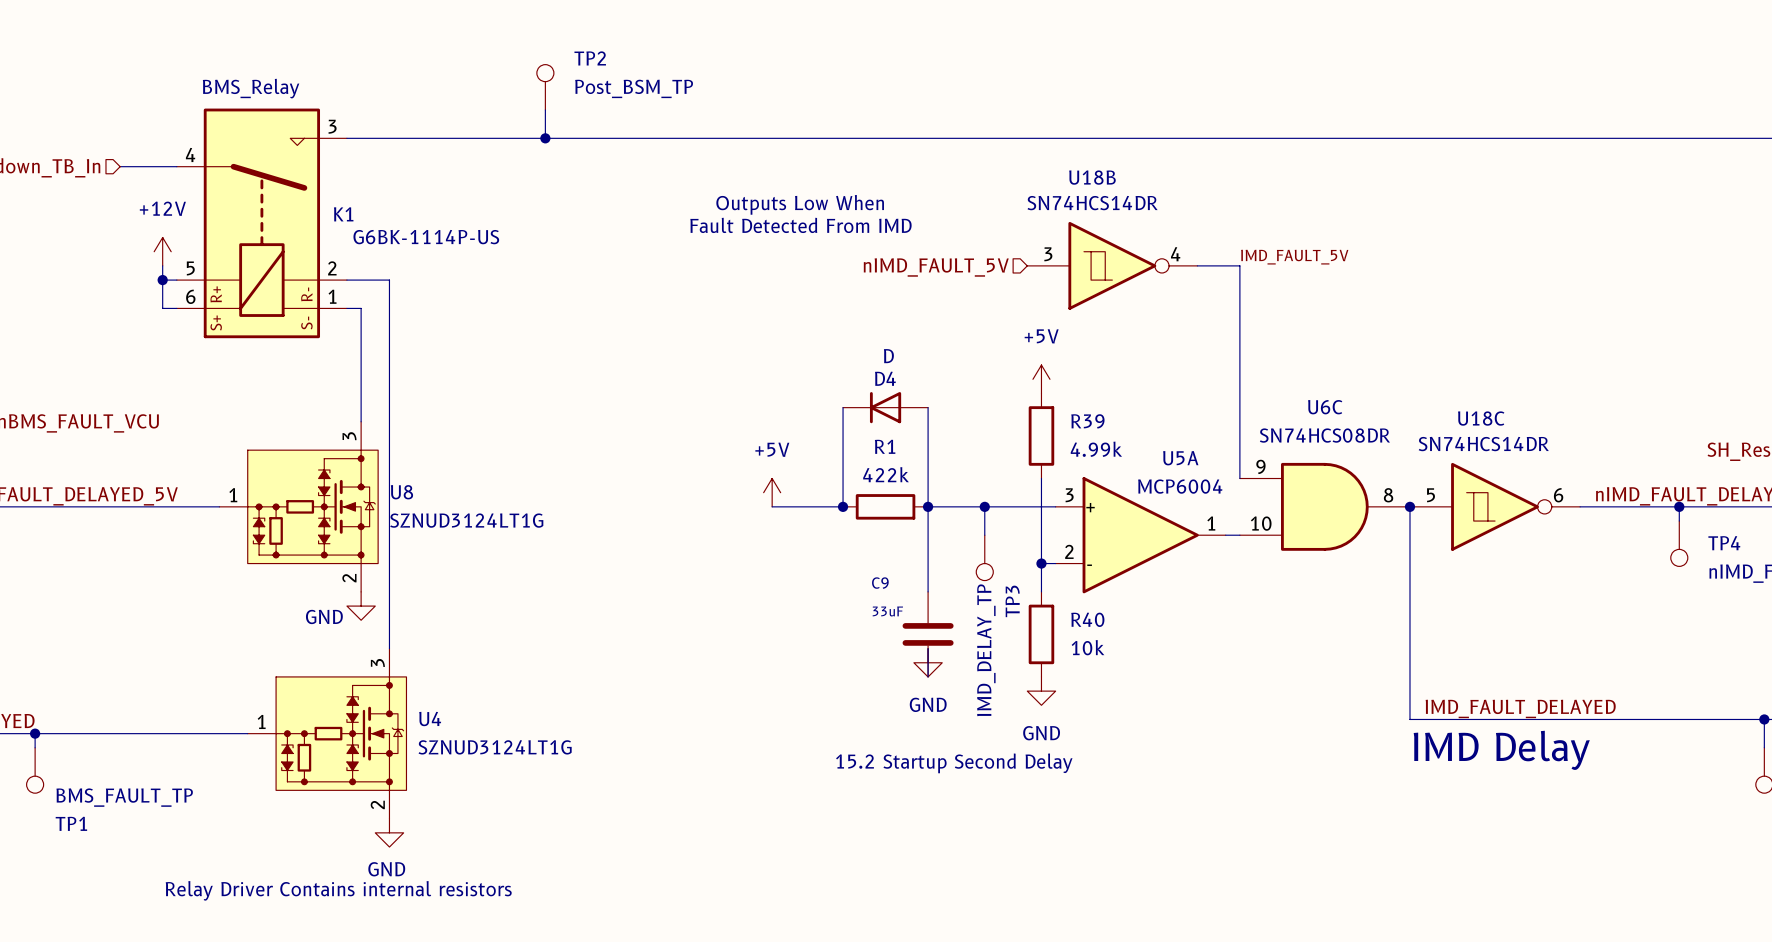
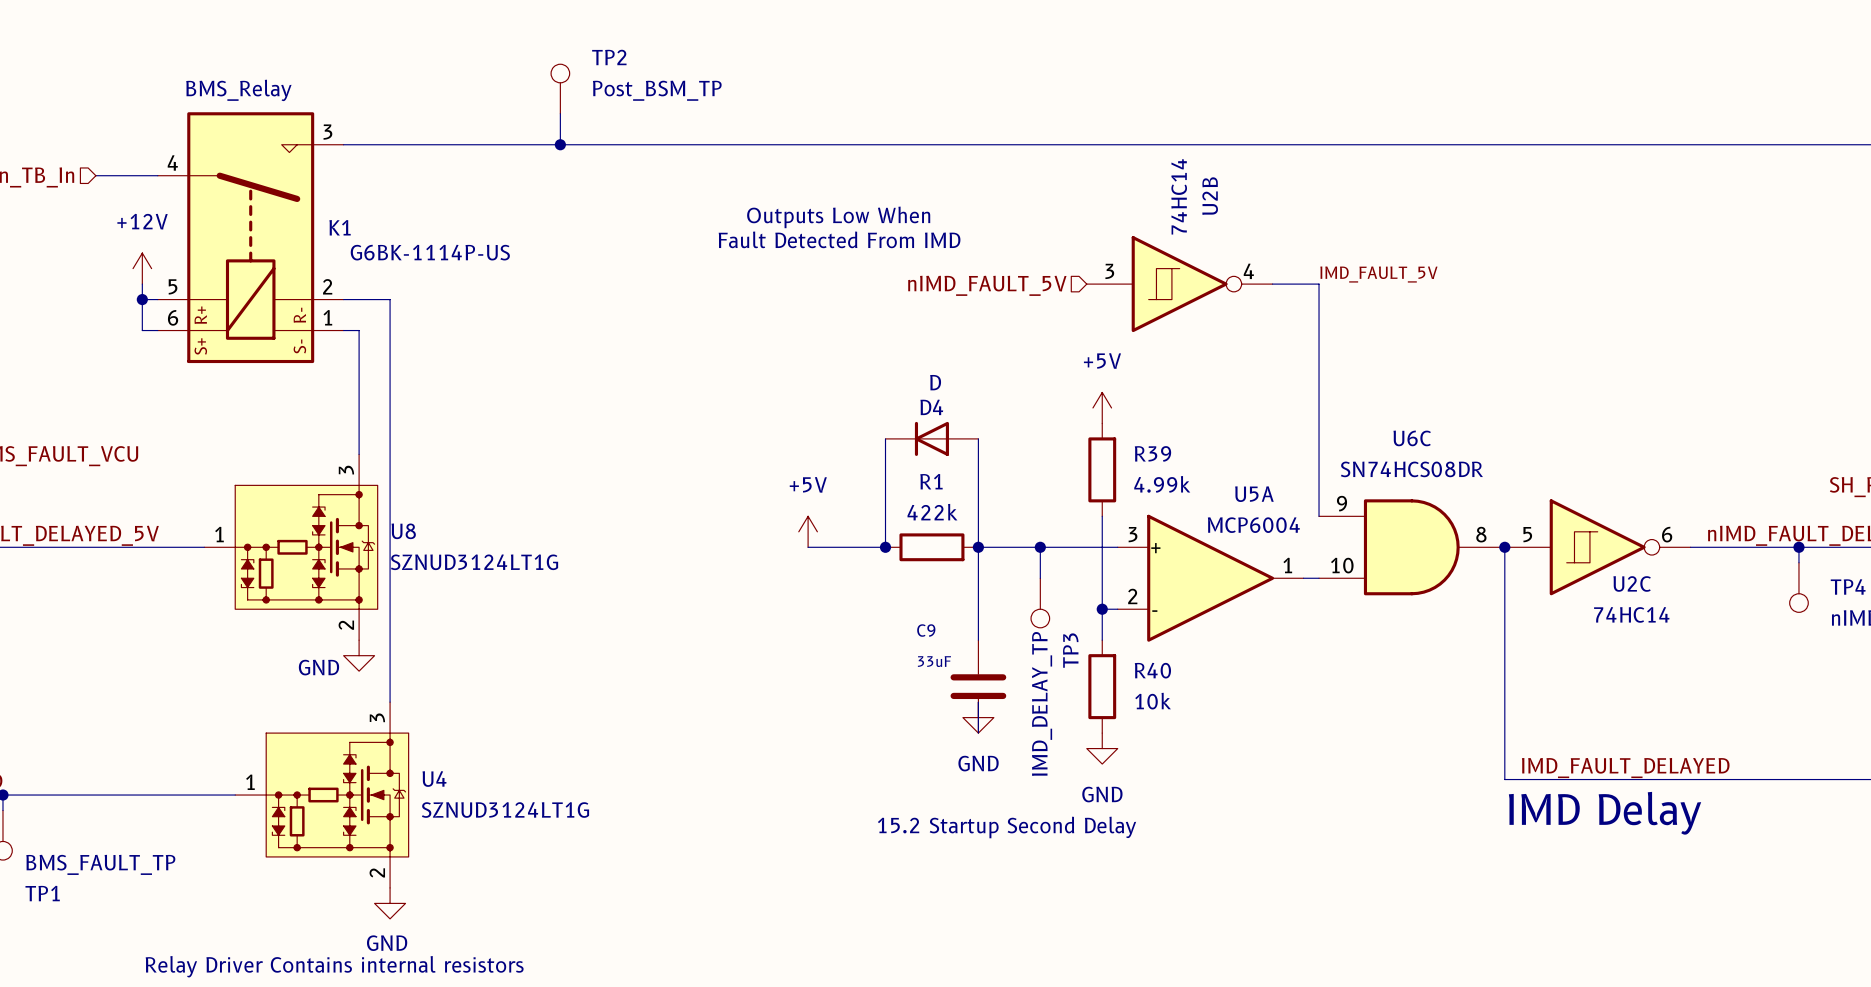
U18B: SN74HCS14DR (1112, 265) -> none
U2B: none -> 74HC14 (1179, 284)
U18C: SN74HCS14DR (1495, 506) -> none
U2C: none -> 74HC14 (1597, 547)

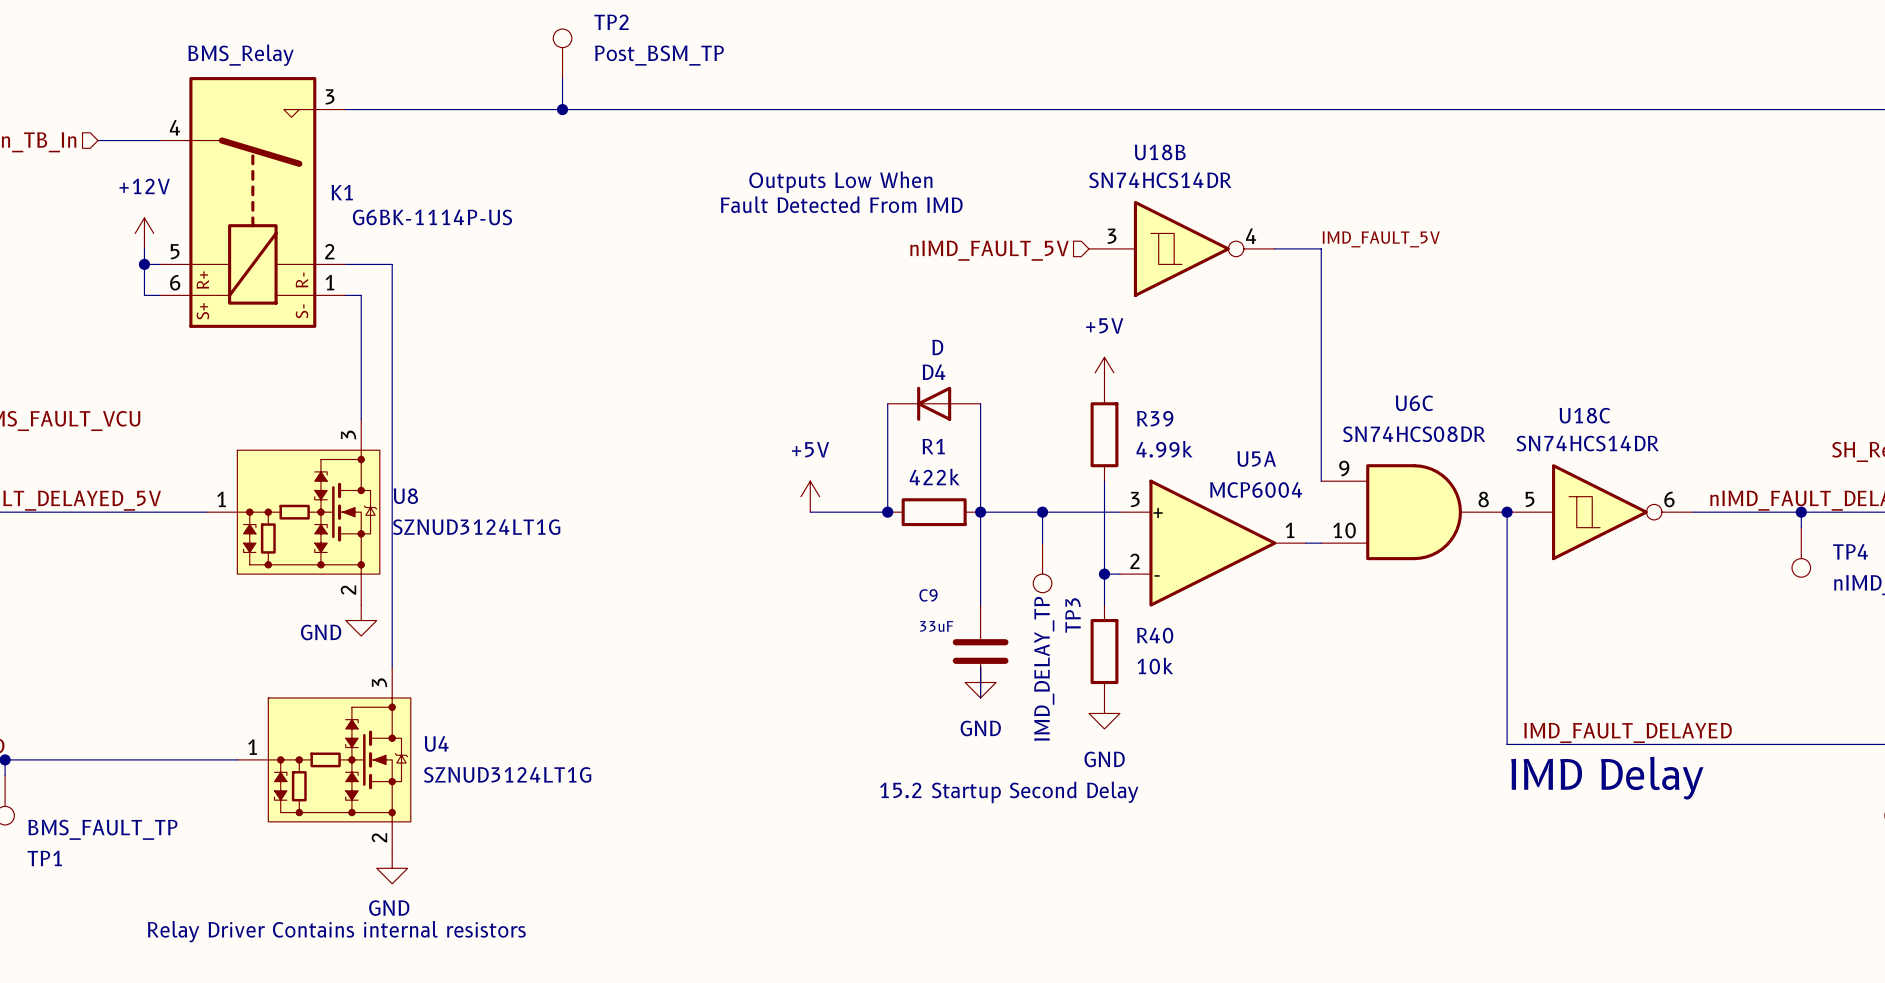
U2B: 74HC14 (1179, 284) -> none
U18B: none -> SN74HCS14DR (1181, 248)
U2C: 74HC14 (1597, 547) -> none
U18C: none -> SN74HCS14DR (1600, 512)

